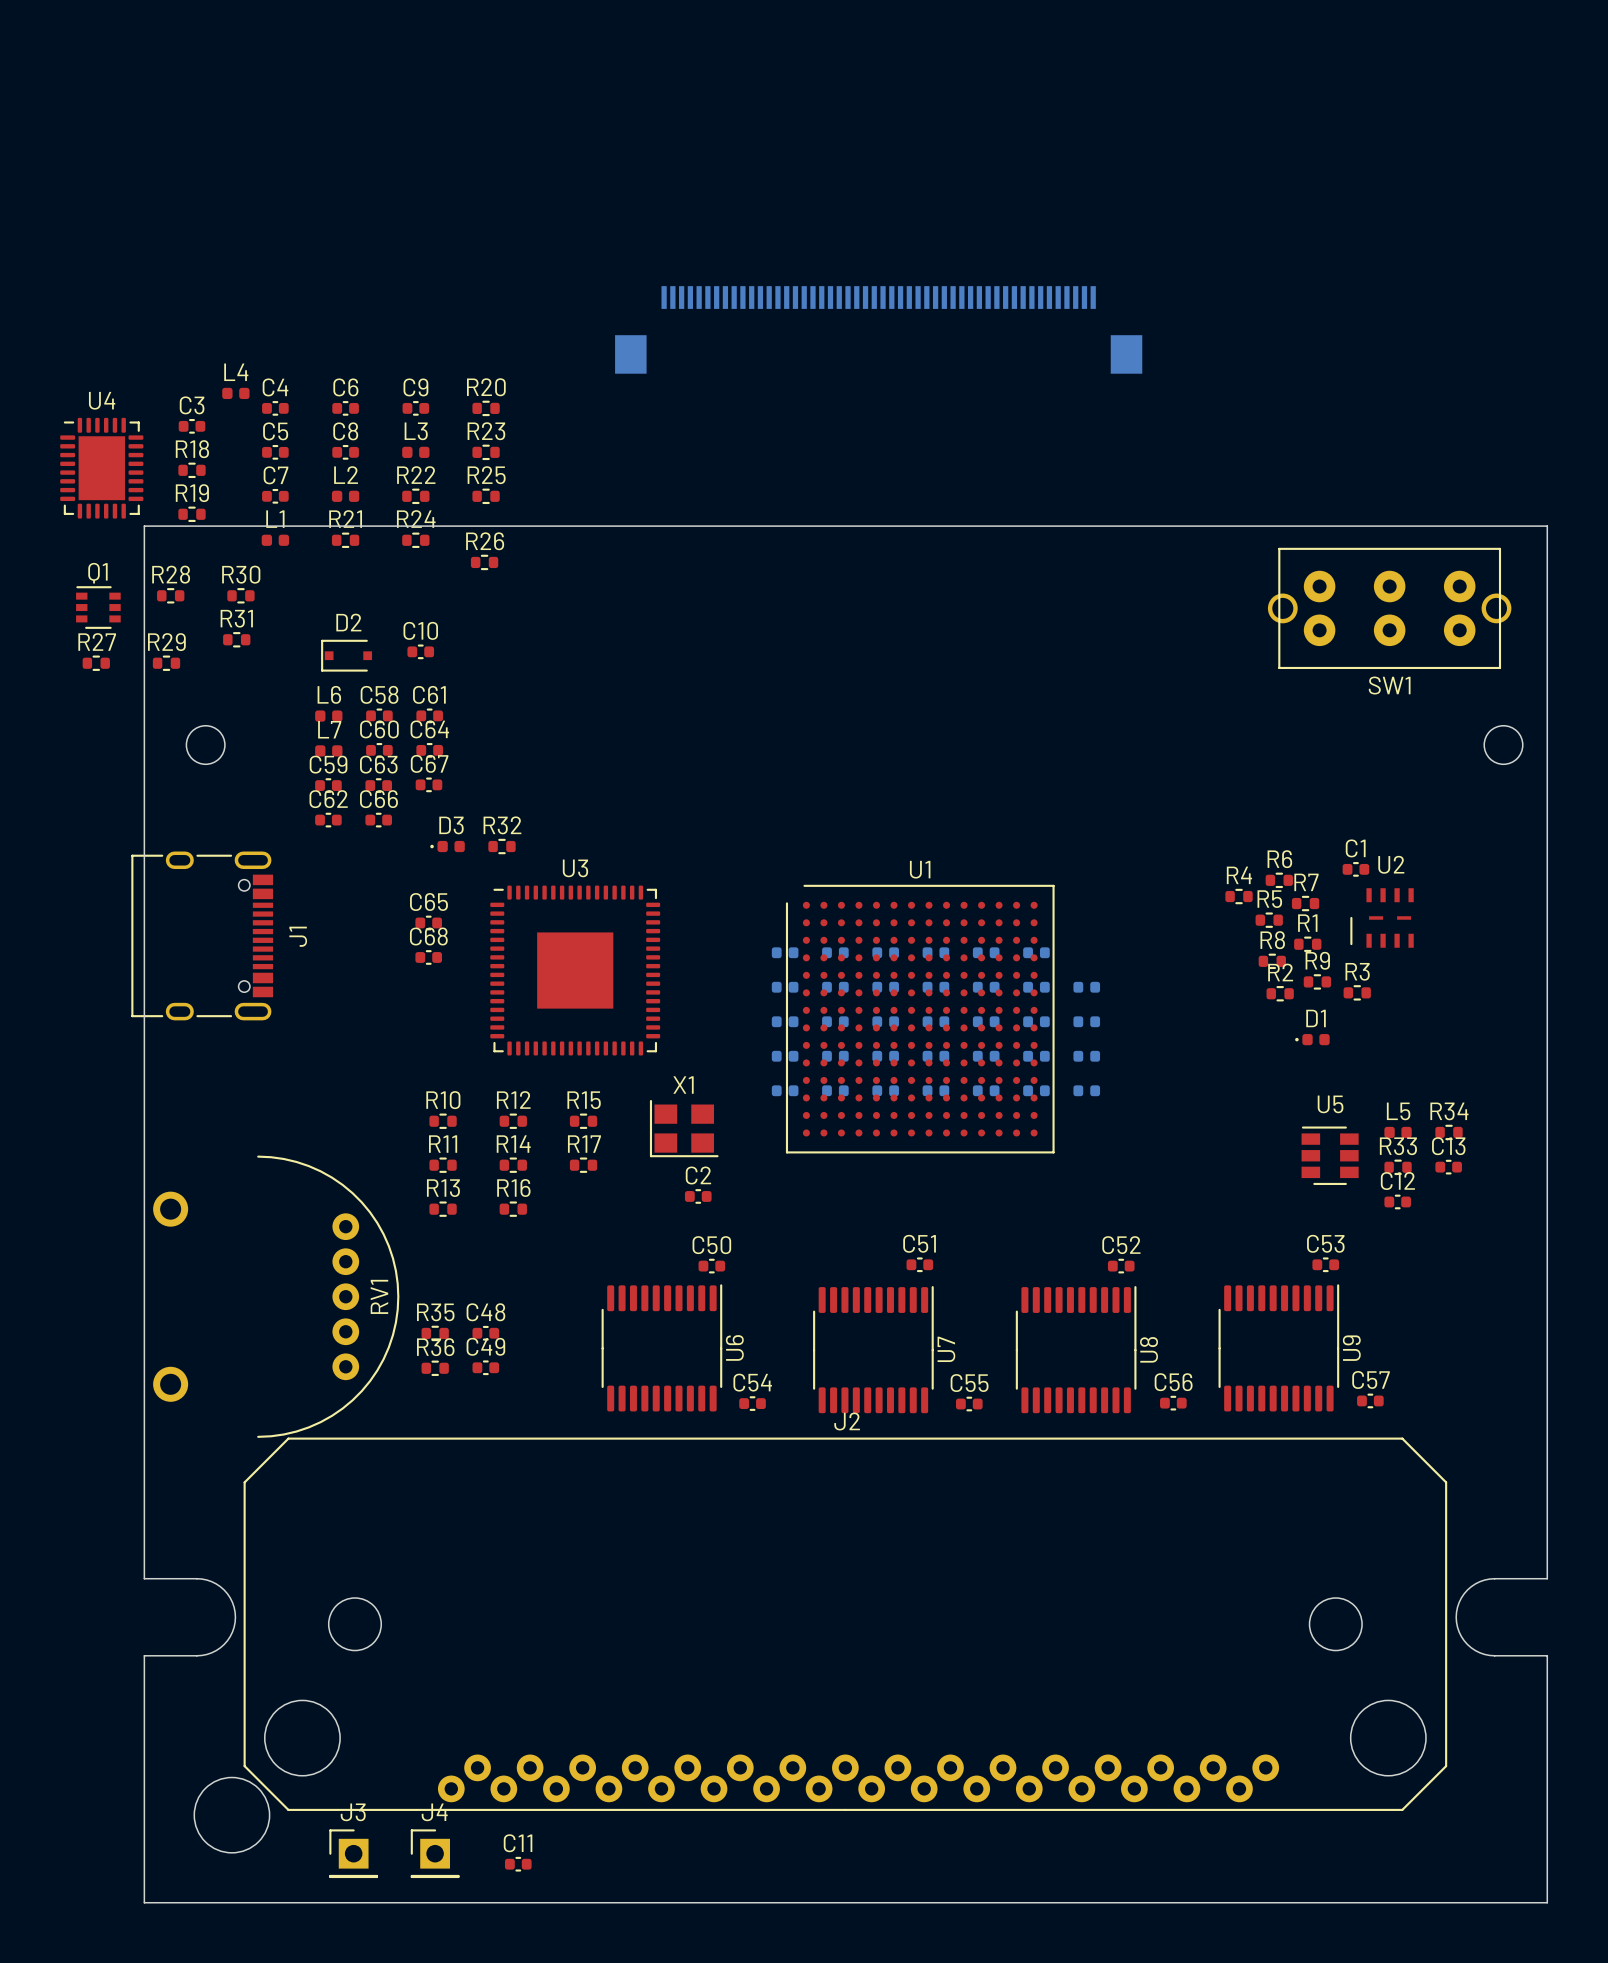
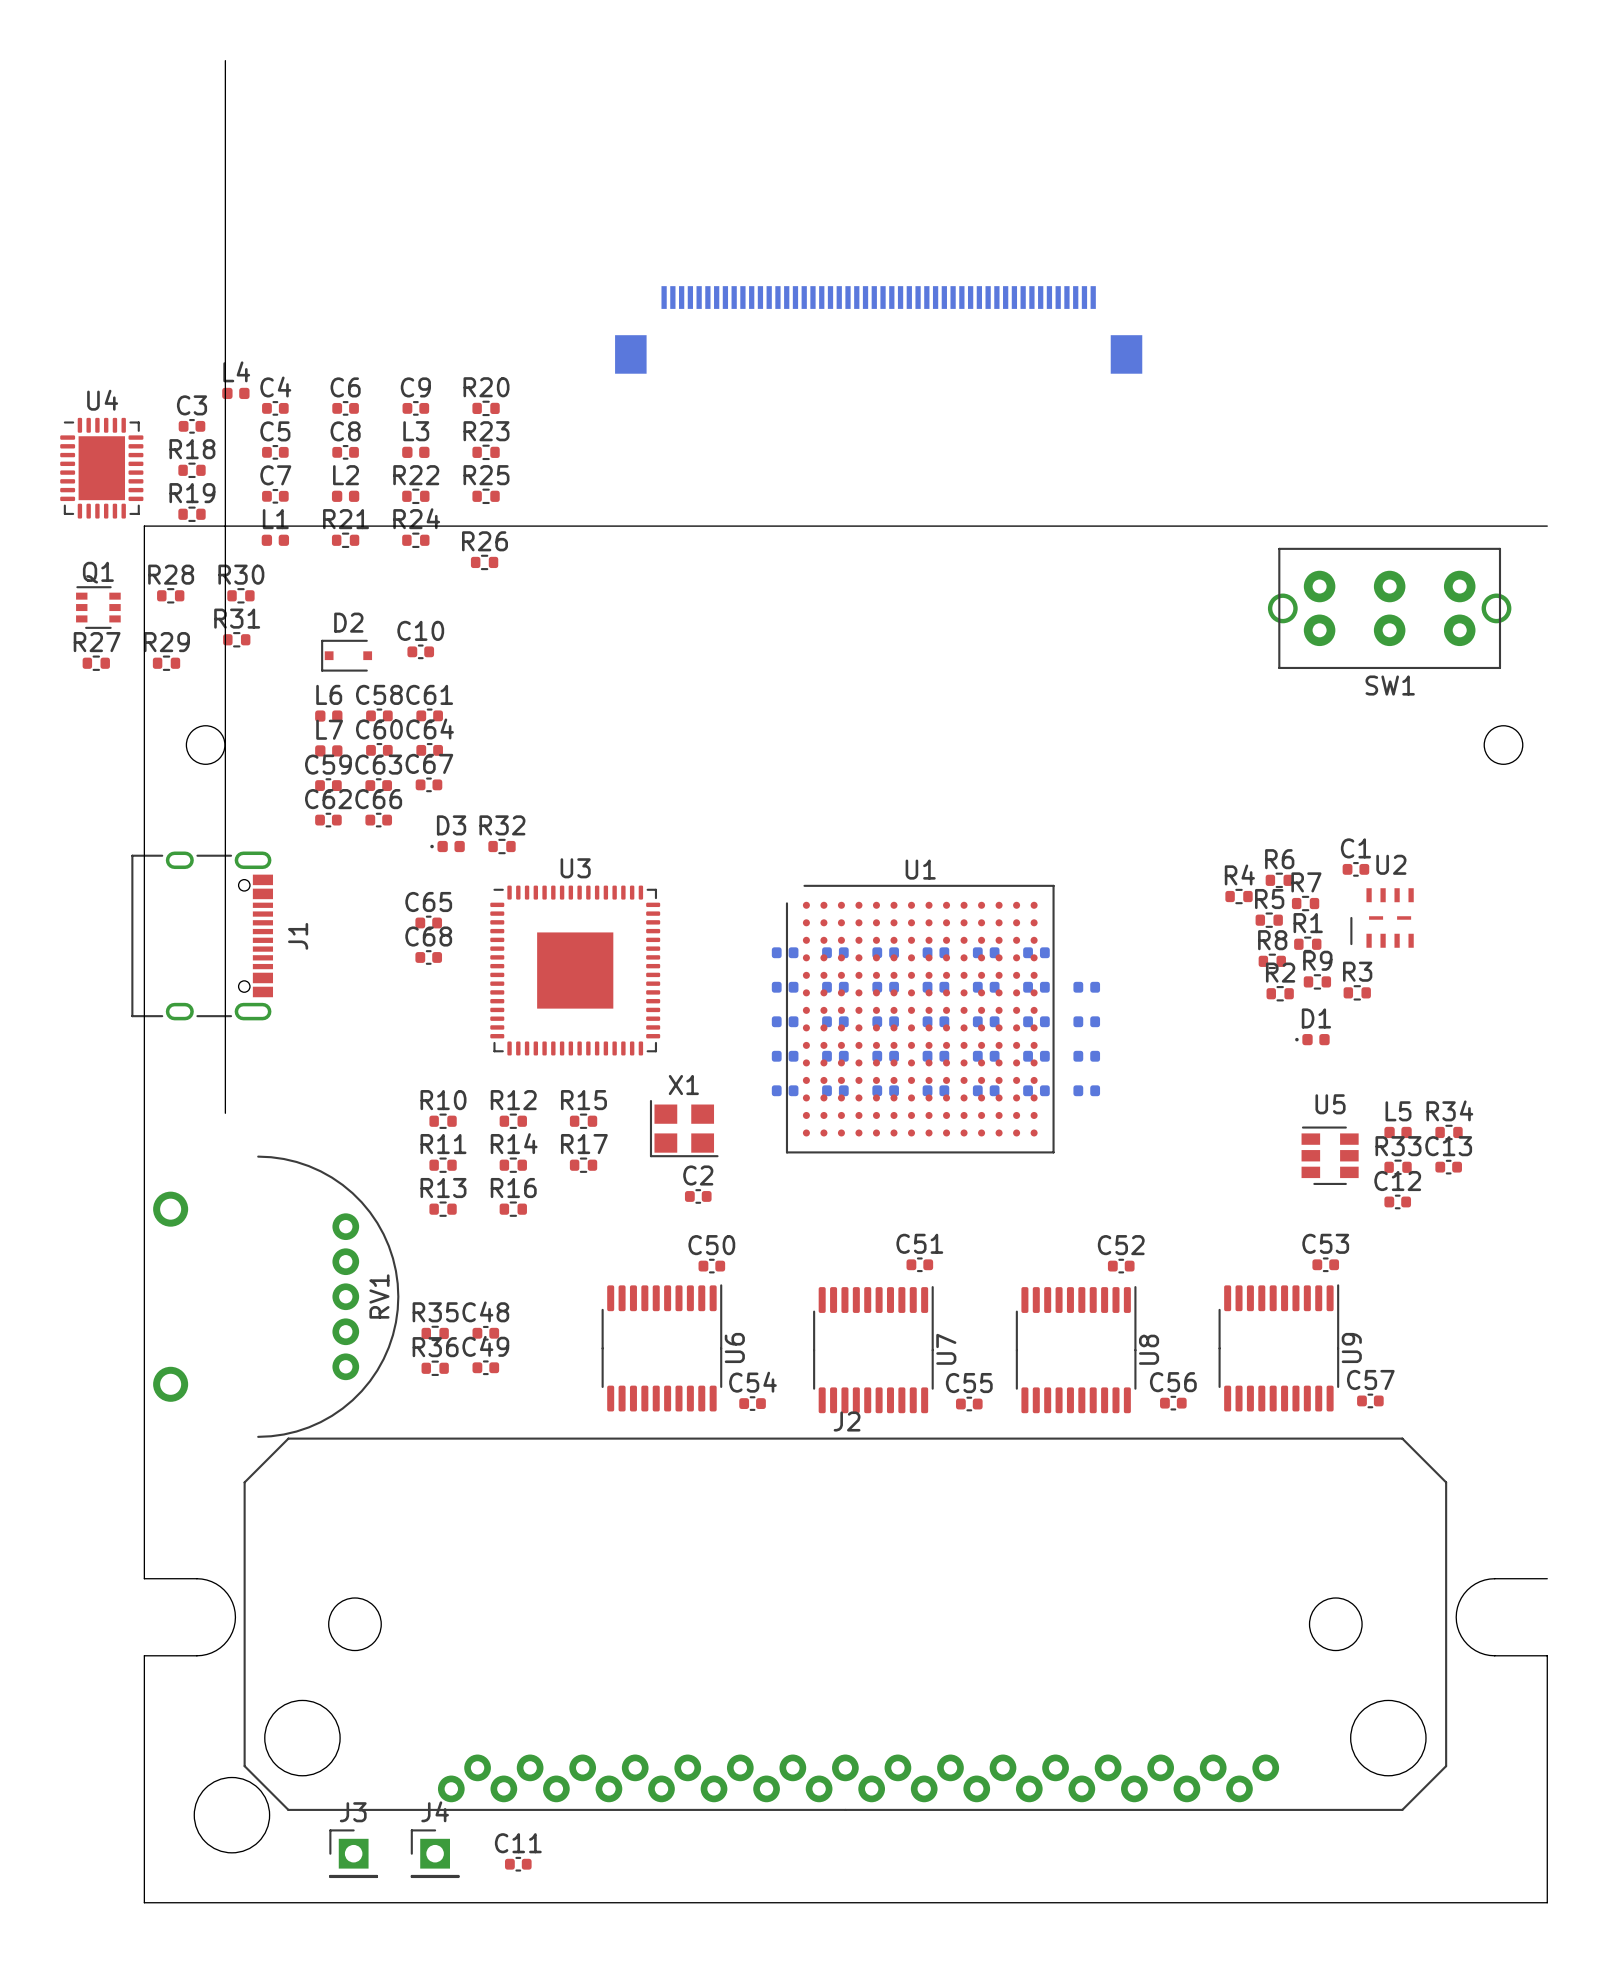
board edge: none -> (225, 60) (225, 1113)
board edge: (1547, 526) (1547, 1578) -> none

